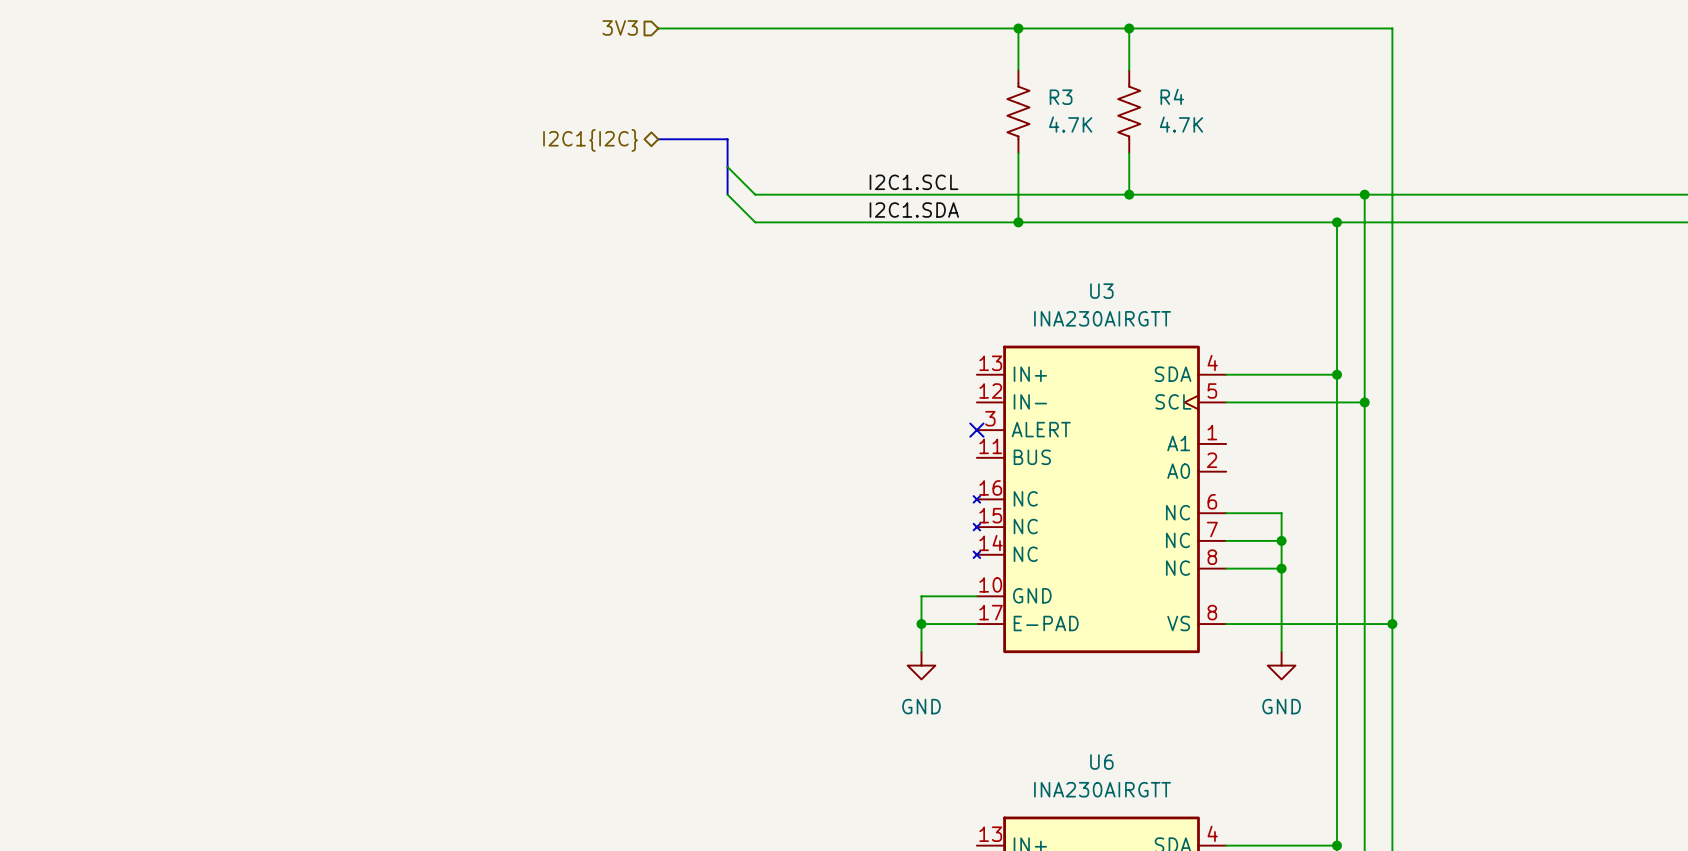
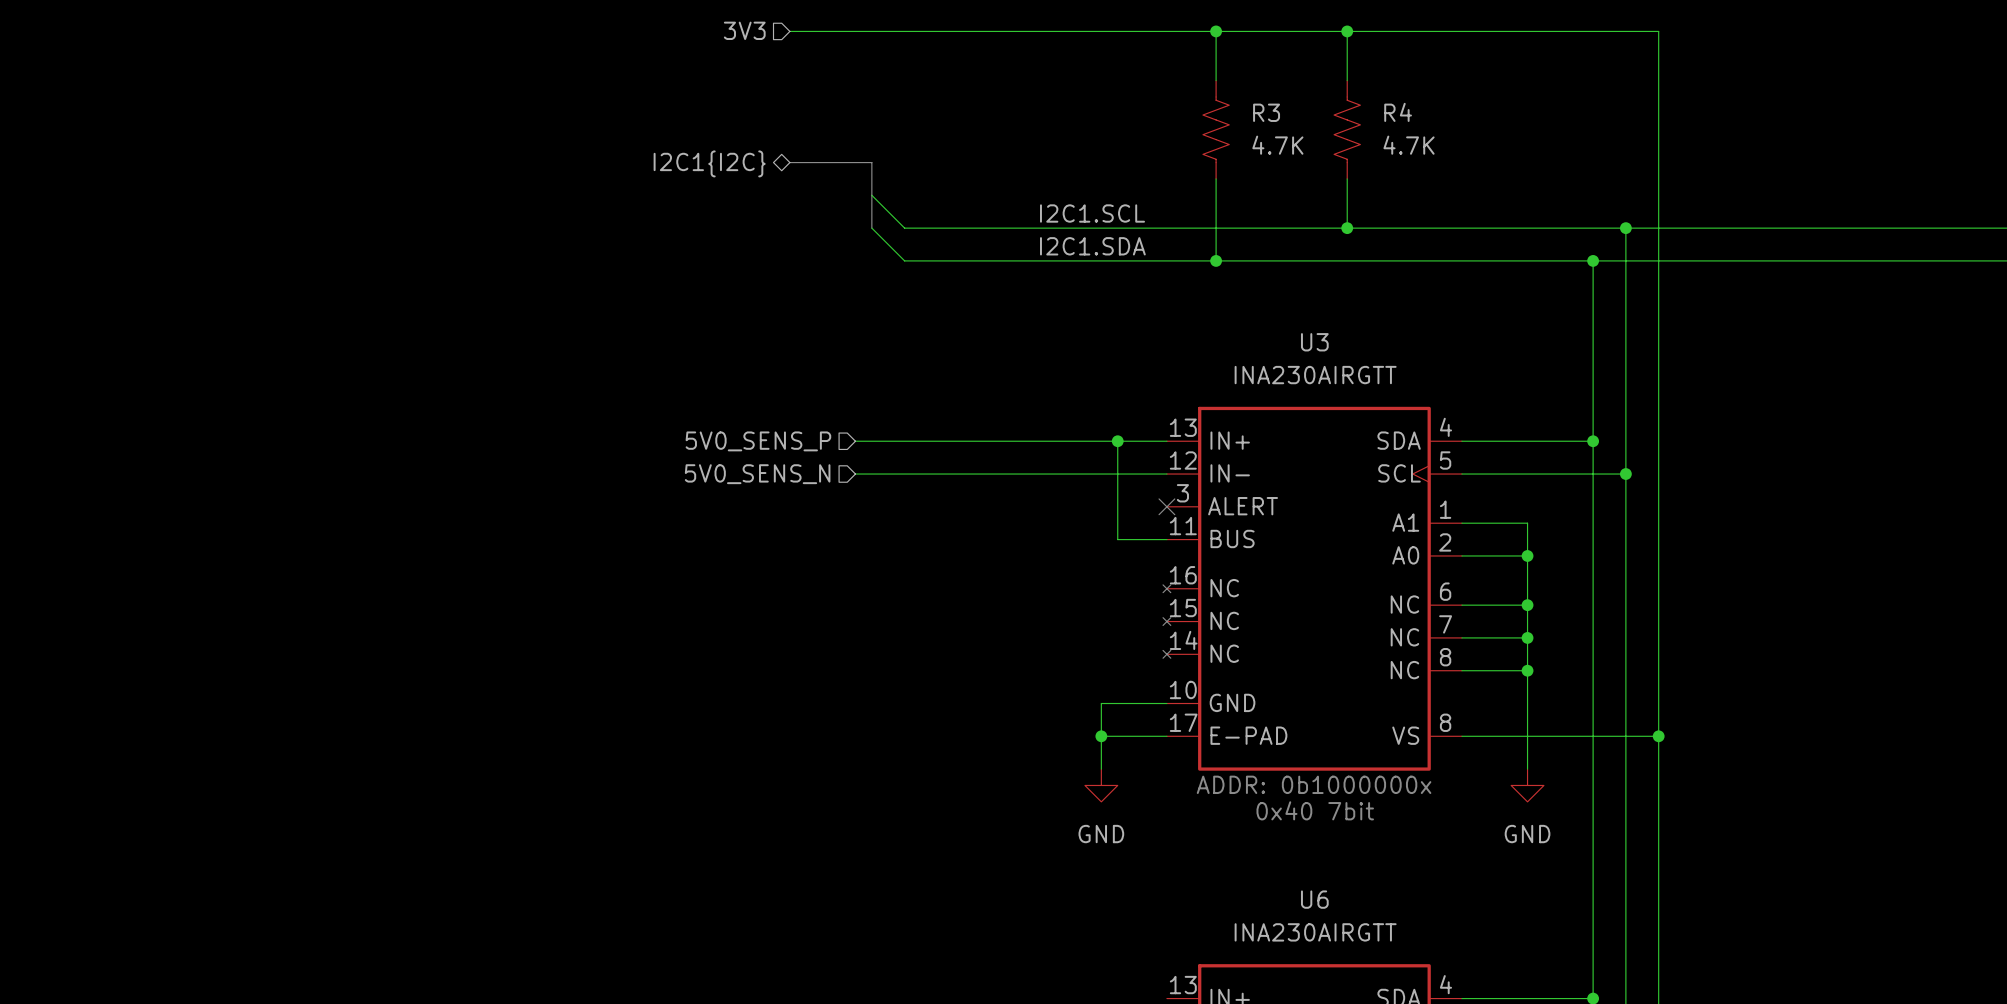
hierarchical label: none -> 5V0_SENS_P (758, 441)
wire: none -> (855, 441) (1166, 441)
wire: none -> (1117, 441) (1117, 539) (1166, 539)
junction: none -> (1117, 441)
hierarchical label: none -> 5V0_SENS_N (757, 474)
wire: none -> (855, 474) (1166, 474)
wire: none -> (1461, 523) (1527, 523) (1527, 605)
wire: none -> (1461, 555) (1527, 555)
junction: none -> (1527, 555)
junction: none -> (1527, 605)
text: none -> ADDR: 0b1000000x (1314, 784)
text: none -> 0x40 7bit (1315, 810)

